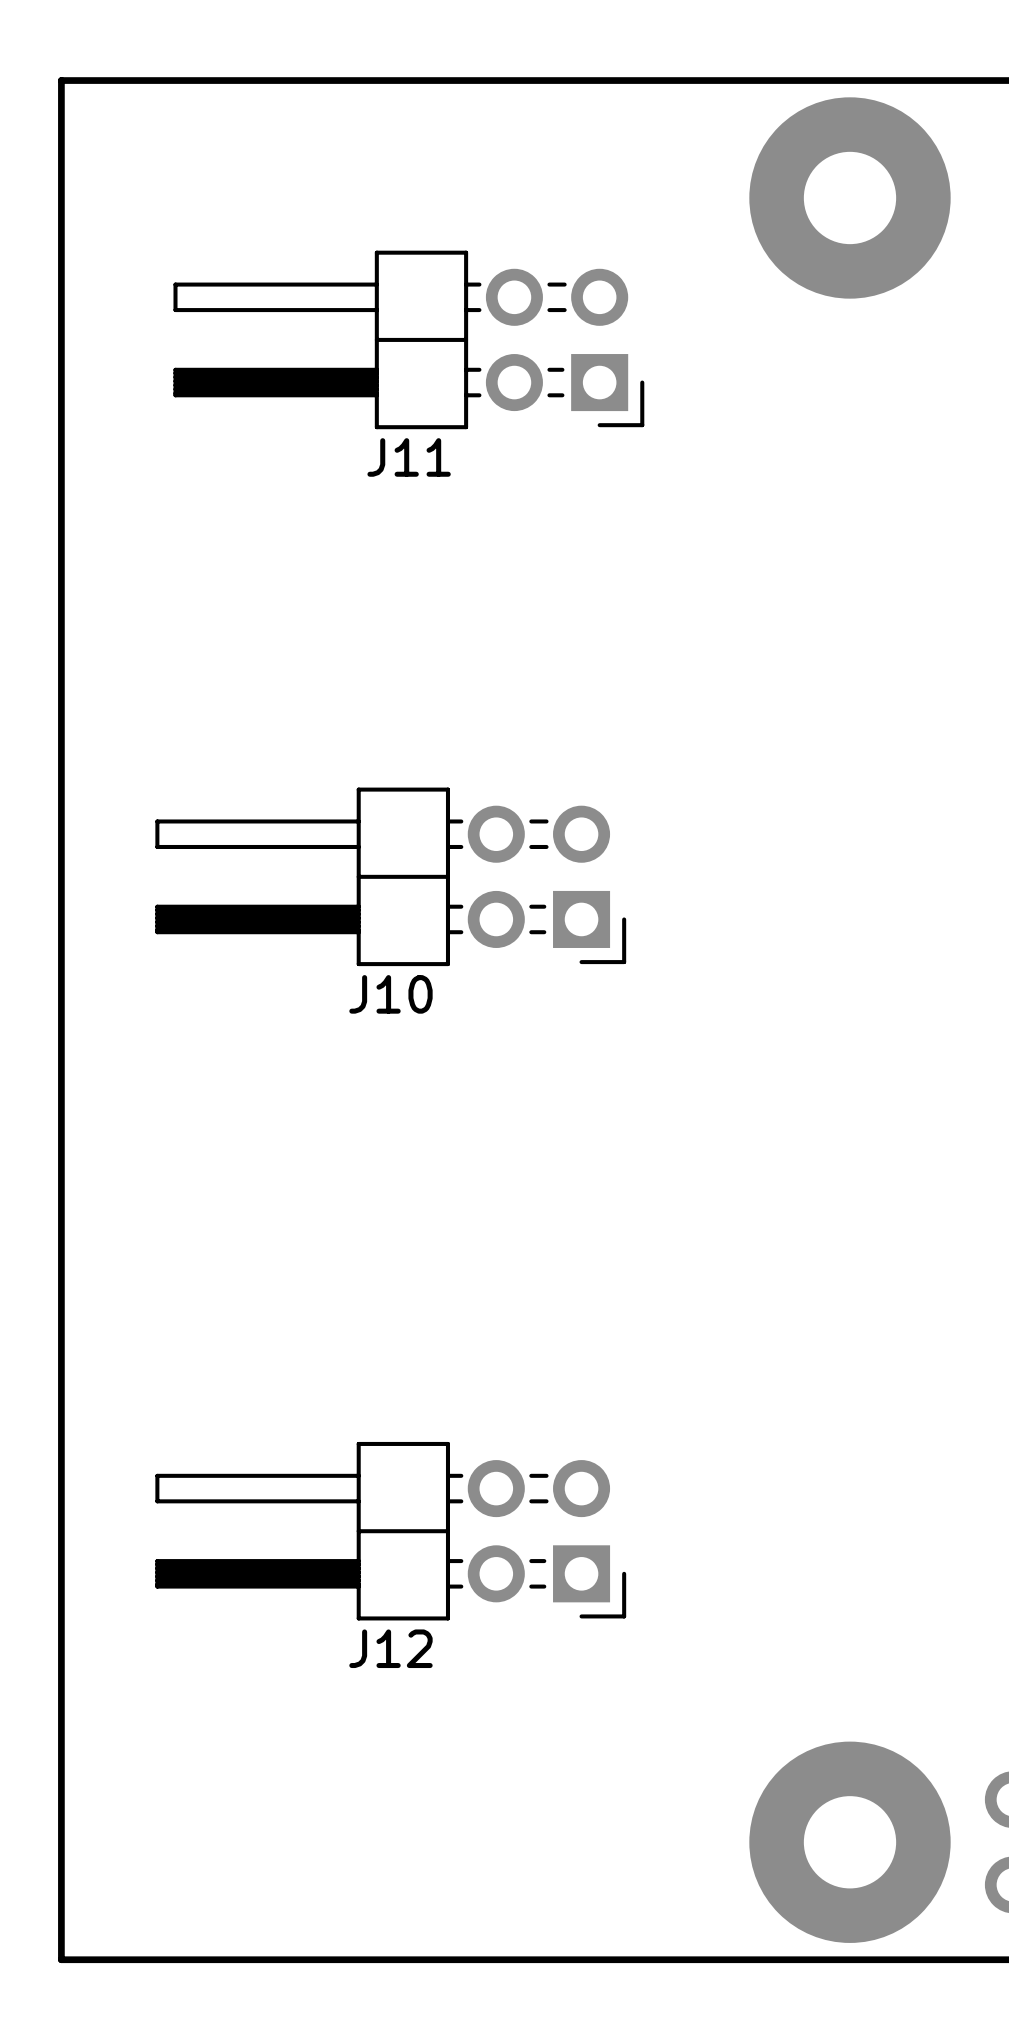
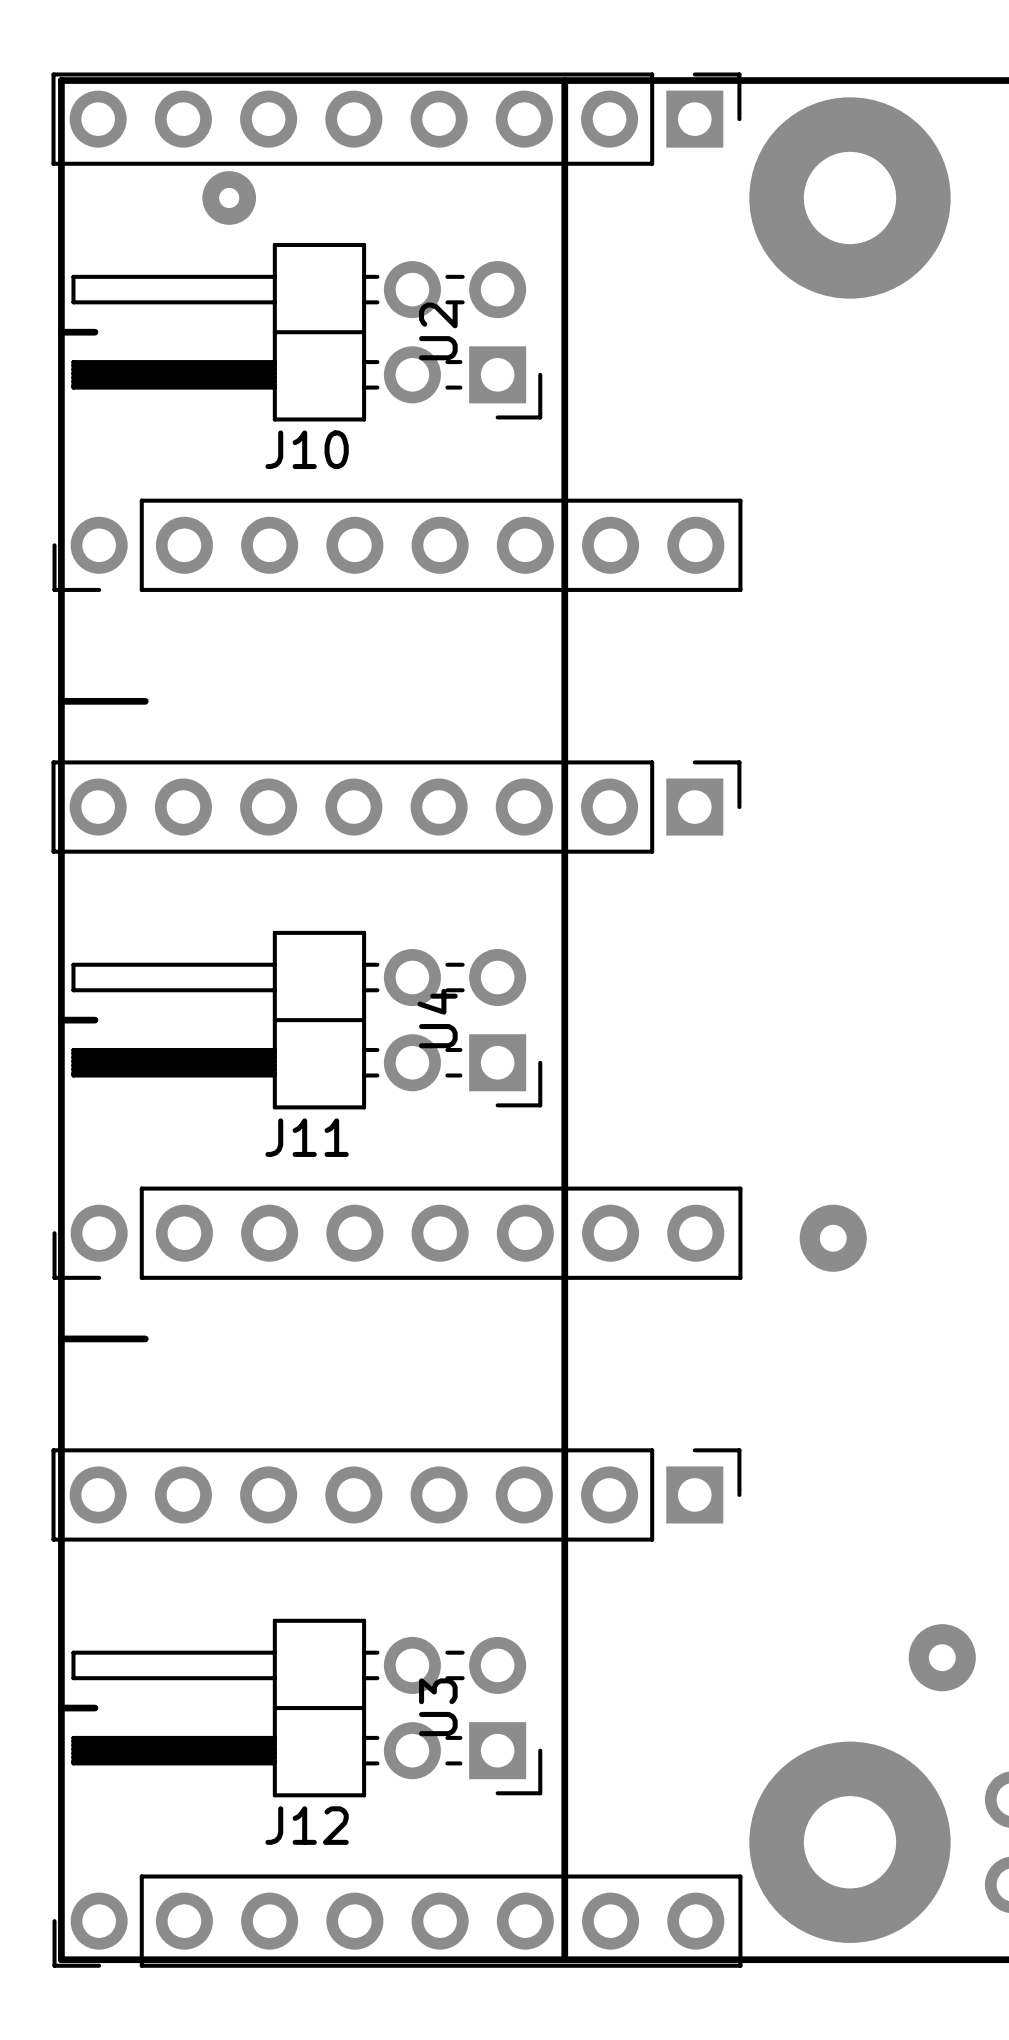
line: none -> (564, 80) (564, 1959)
via: none -> (229, 197)
line: none -> (61, 332) (94, 332)
U2: none -> (396, 332)
J11 position: (408, 339) -> (306, 1020)
line: none -> (61, 701) (145, 701)
J10 position: (390, 876) -> (306, 332)
line: none -> (61, 1020) (94, 1020)
U4: none -> (396, 1020)
via: none -> (833, 1238)
line: none -> (61, 1338) (145, 1338)
J12 position: (390, 1531) -> (306, 1708)
via: none -> (942, 1657)
line: none -> (61, 1708) (94, 1708)
U3: none -> (396, 1708)

